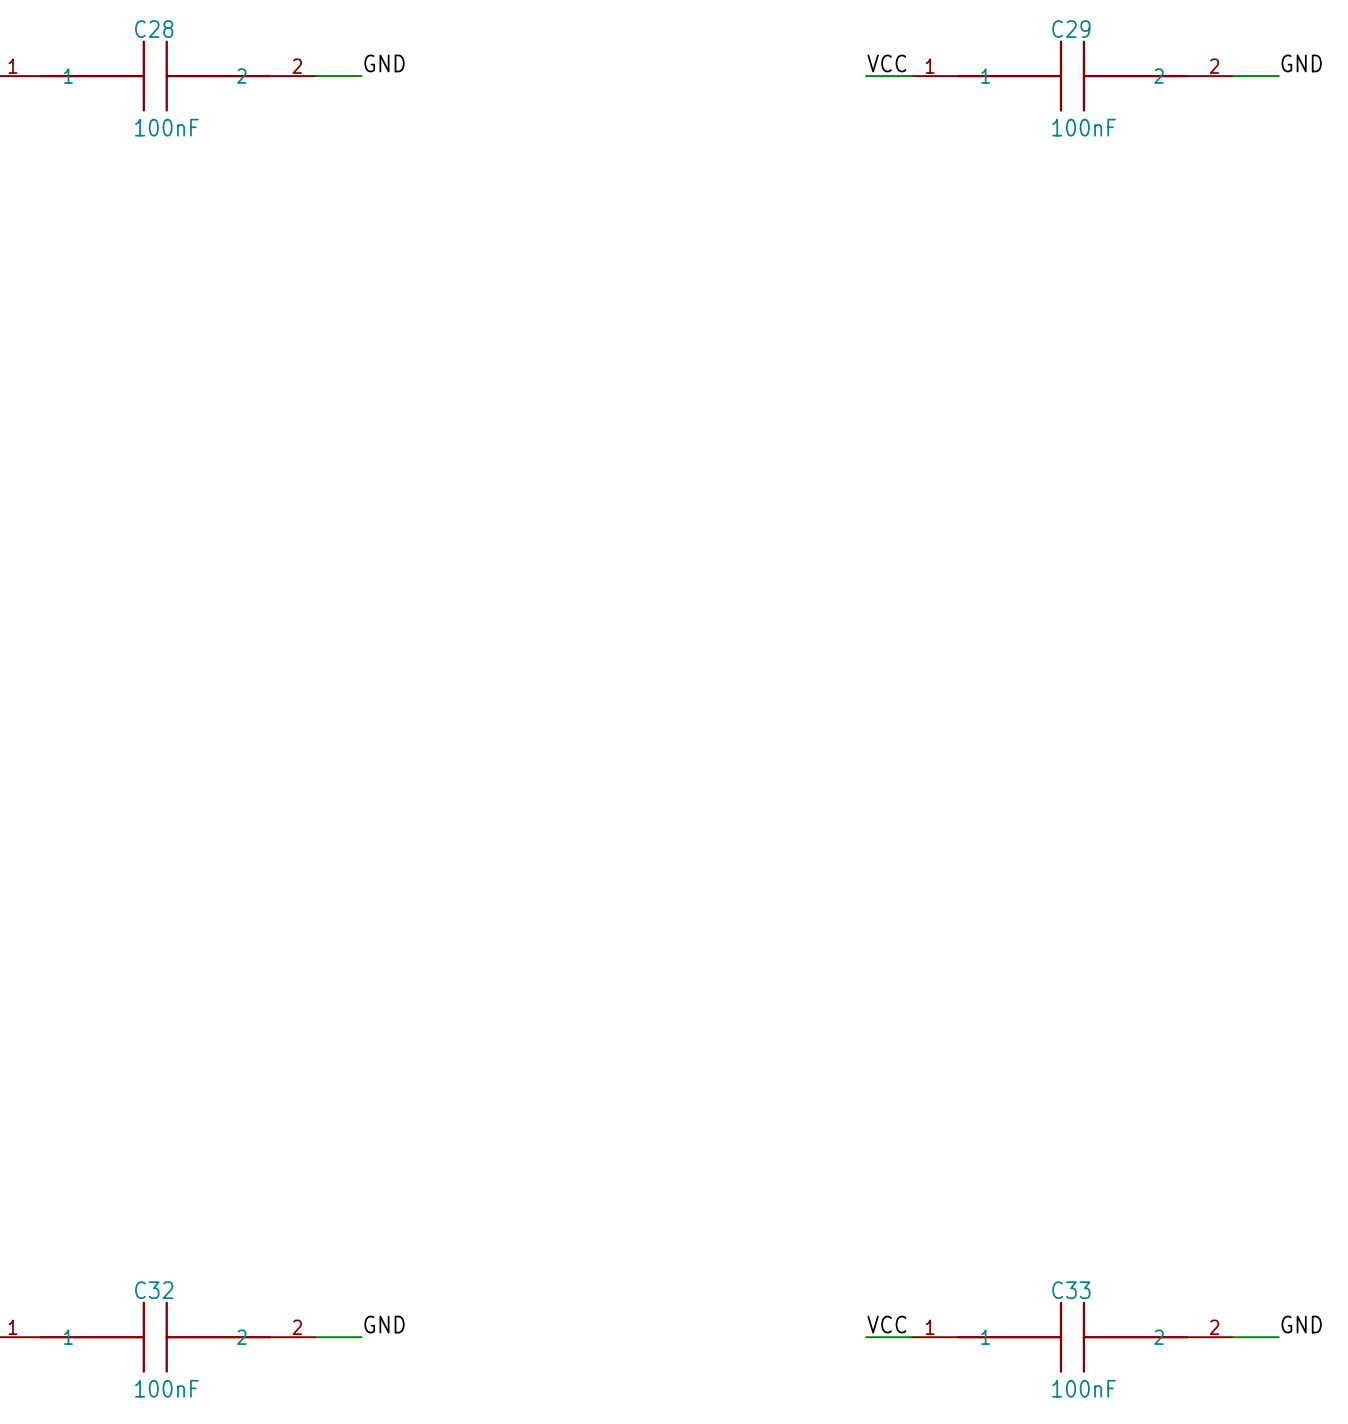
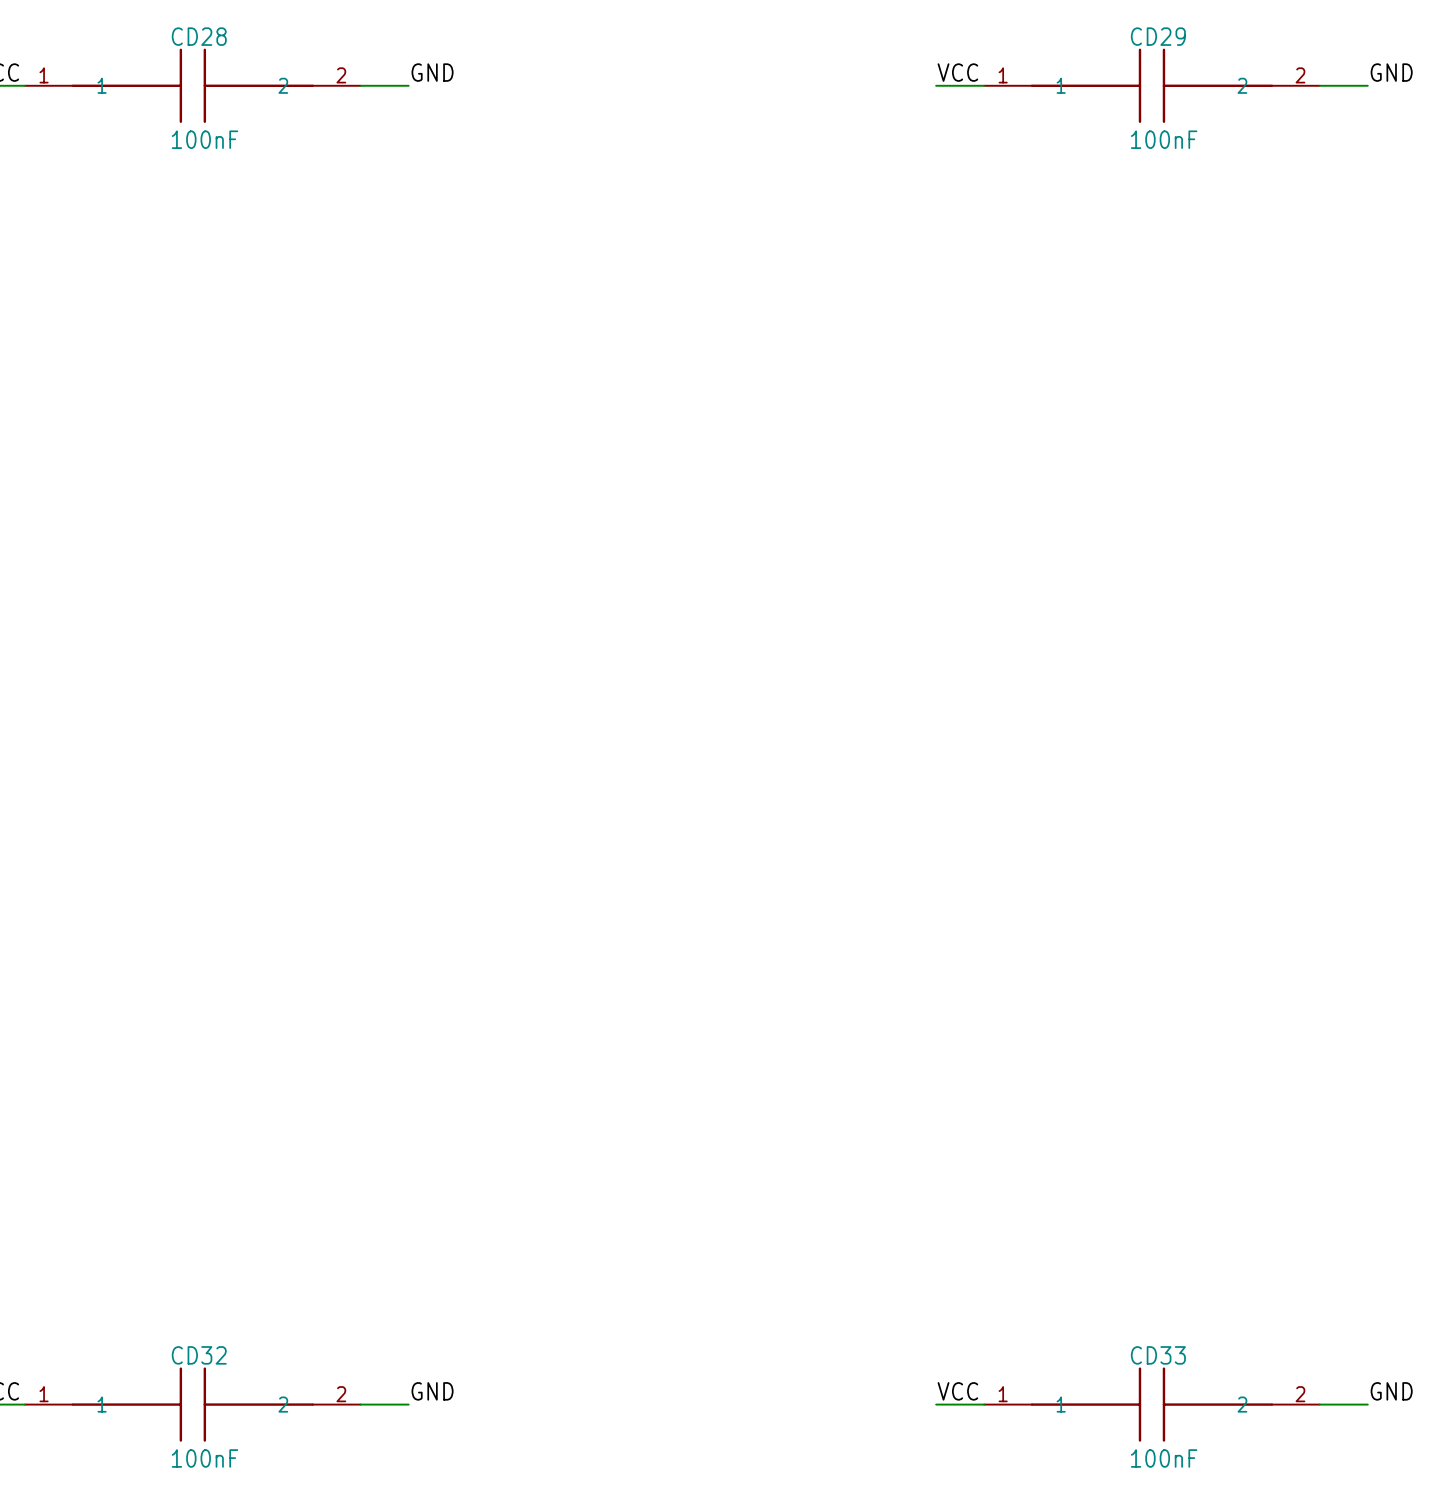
C28 name: C28 (154, 29) -> CD28 (199, 36)
C29 name: C29 (1071, 29) -> CD29 (1158, 36)
C32 name: C32 (154, 1290) -> CD32 (199, 1355)
C33 name: C33 (1071, 1290) -> CD33 (1158, 1355)

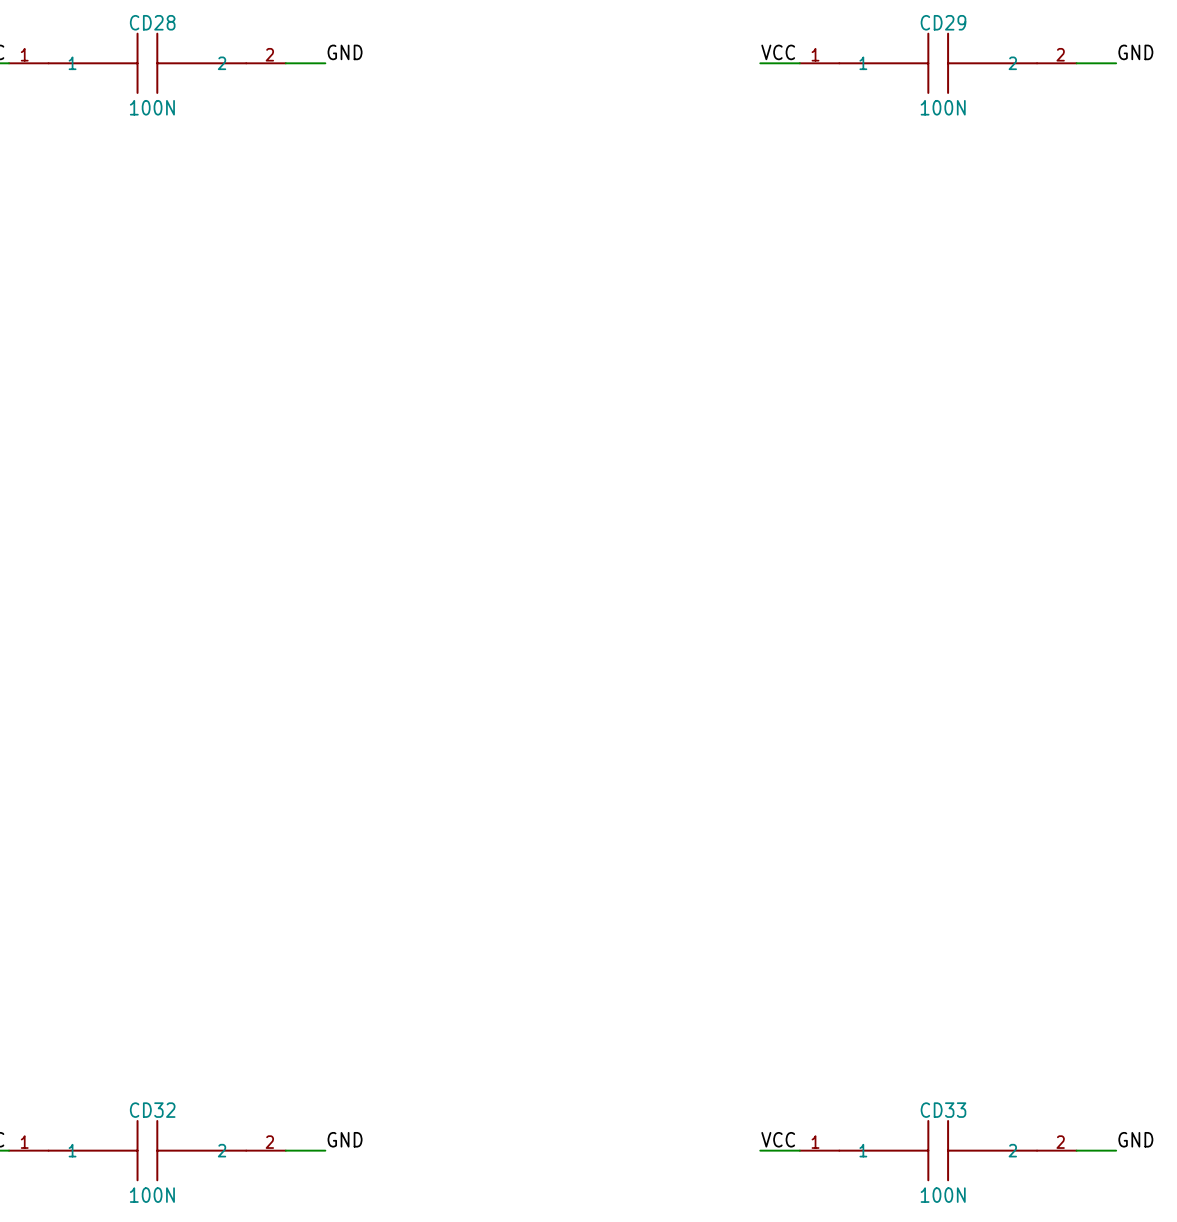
CD28 value: 100nF (204, 139) -> 100N (152, 107)
CD29 value: 100nF (1164, 139) -> 100N (943, 107)
CD32 value: 100nF (204, 1458) -> 100N (152, 1195)
CD33 value: 100nF (1164, 1458) -> 100N (943, 1195)

